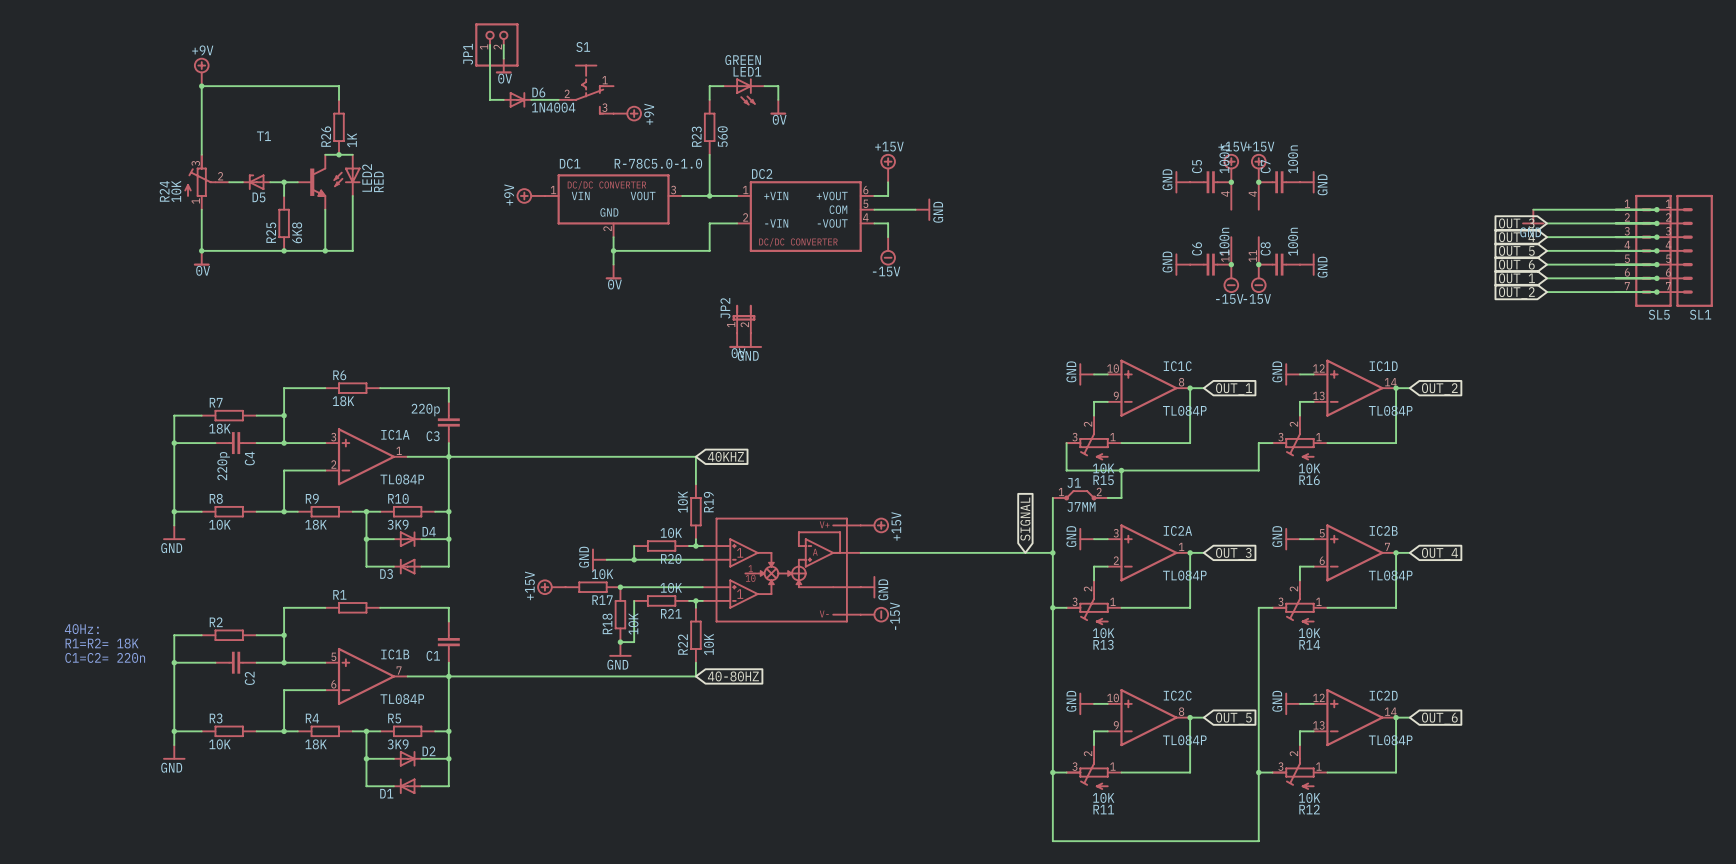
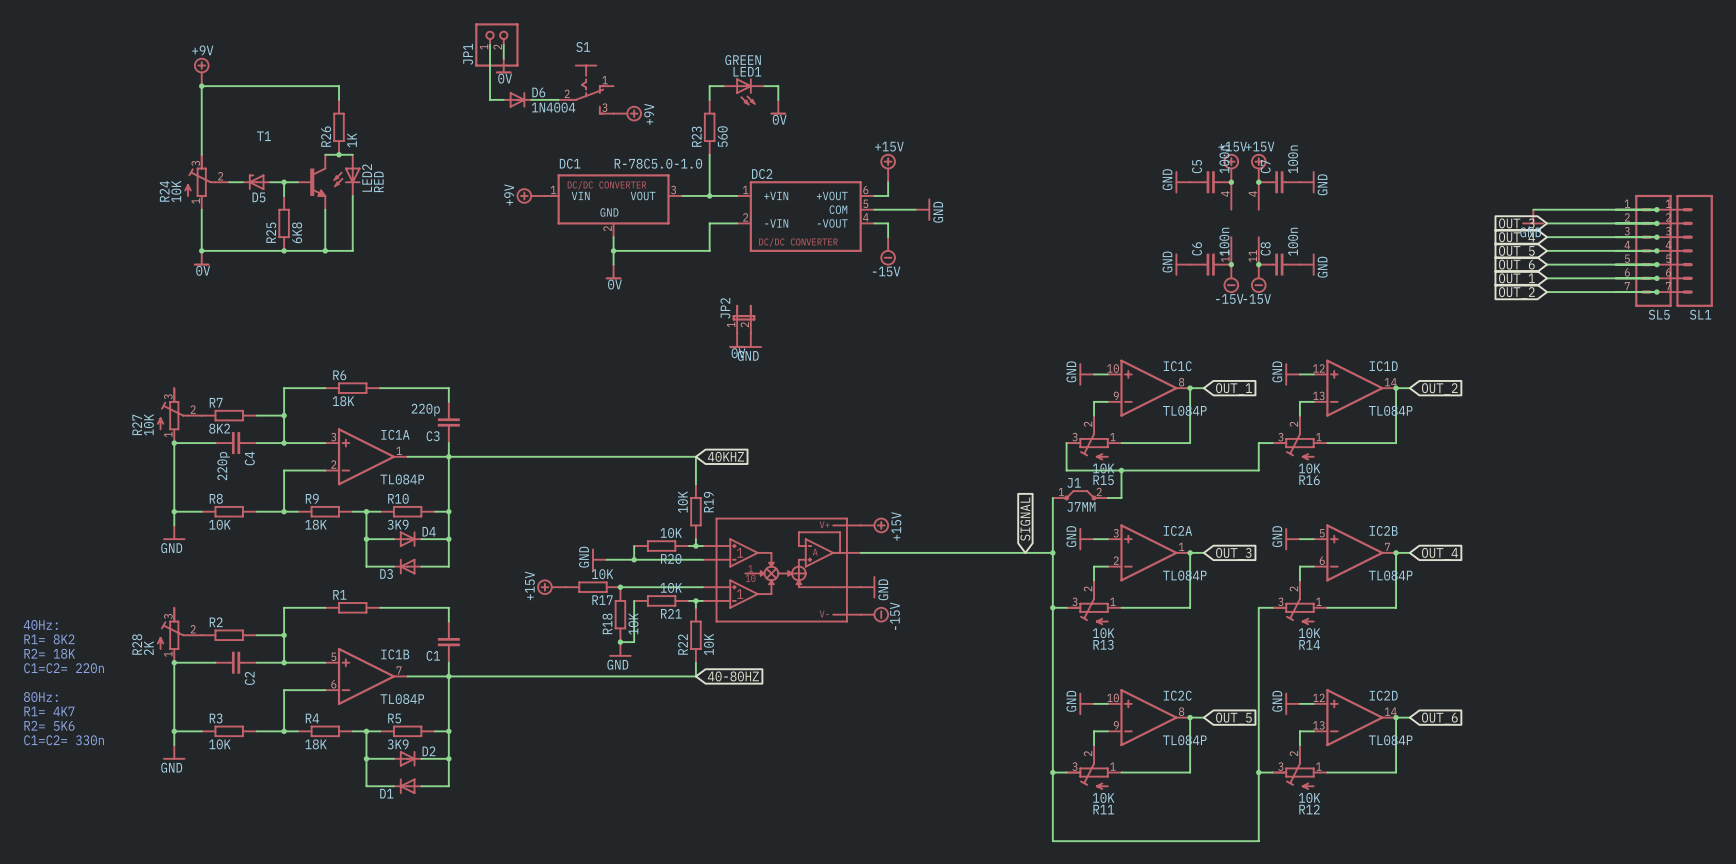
R27: none -> 10K (179, 415)
R7 value: 18K (219, 428) -> 8K2 (219, 428)
text position: 40Hz: (81, 629) -> 40Hz: (40, 624)
R28: none -> 2K (179, 635)
text: none -> R1= 8K2 (49, 639)
text: R1=R2= 18K (102, 643) -> none
text: none -> R2= 18K (49, 653)
text position: C1=C2= 220n (105, 657) -> C1=C2= 220n (64, 668)
text: none -> 80Hz: (40, 697)
text: none -> R1= 4K7 (49, 711)
text: none -> R2= 5K6 (49, 725)
text: none -> C1=C2= 330n (64, 740)

